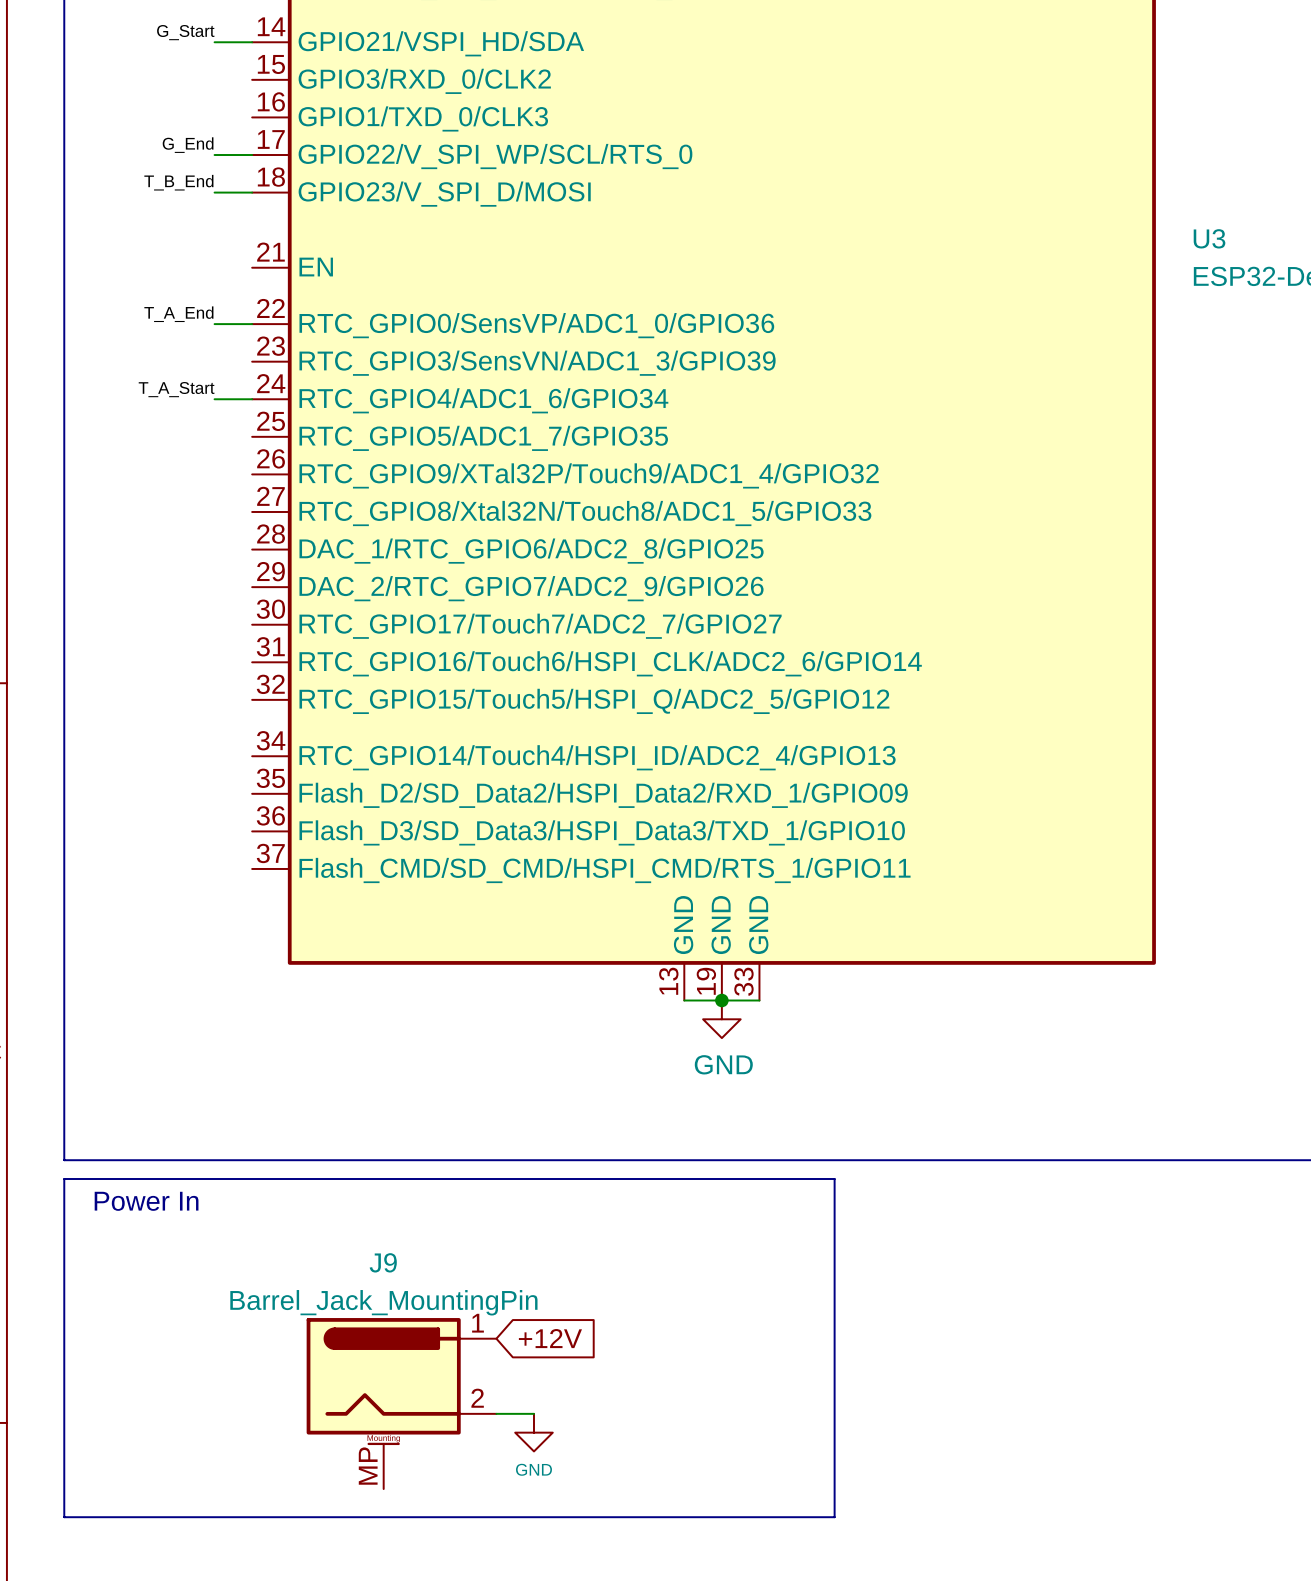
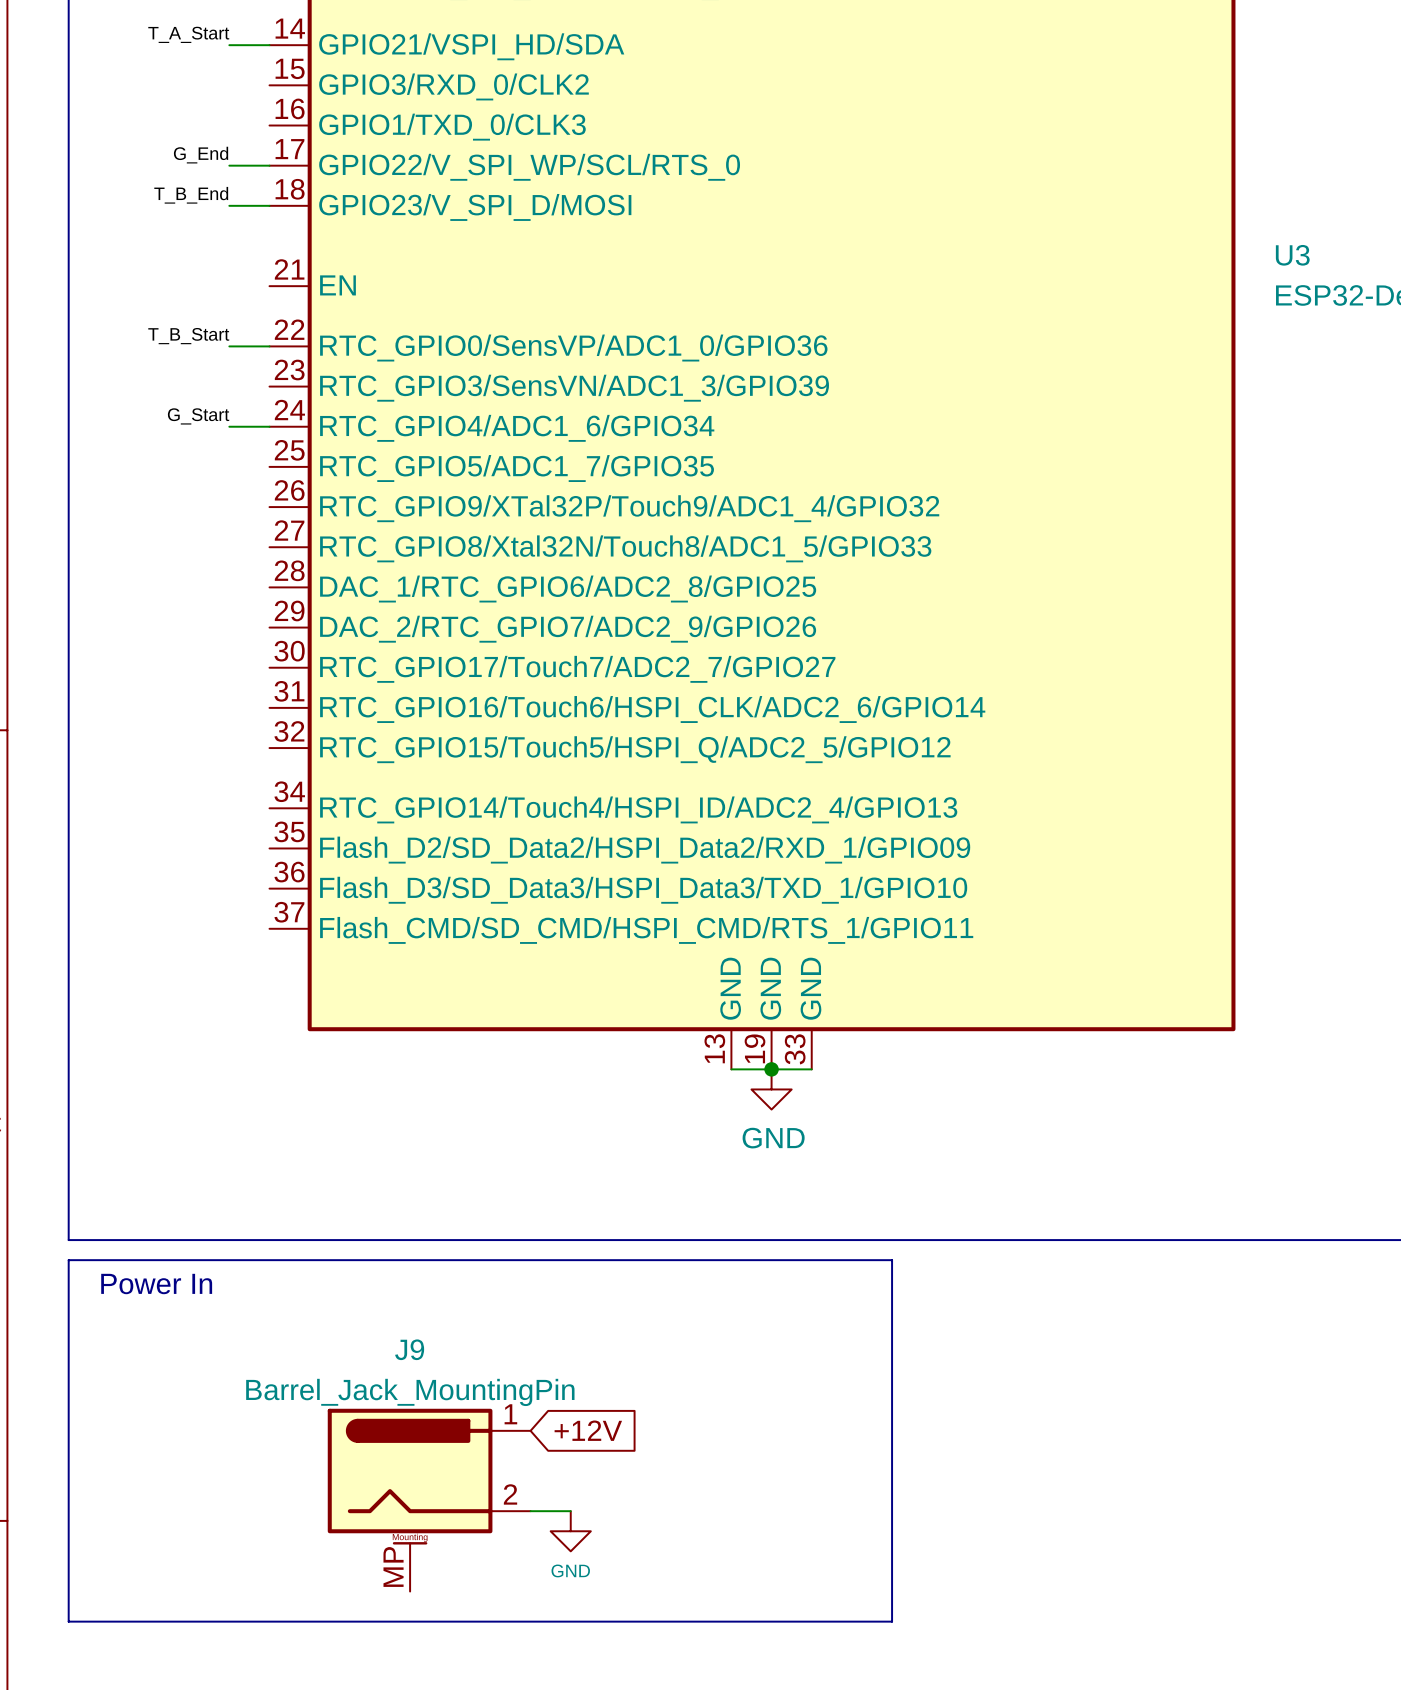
label: G_Start (185, 32) -> T_A_Start (188, 34)
label: T_A_End (178, 314) -> T_B_Start (188, 336)
label: T_A_Start (176, 389) -> G_Start (198, 416)

